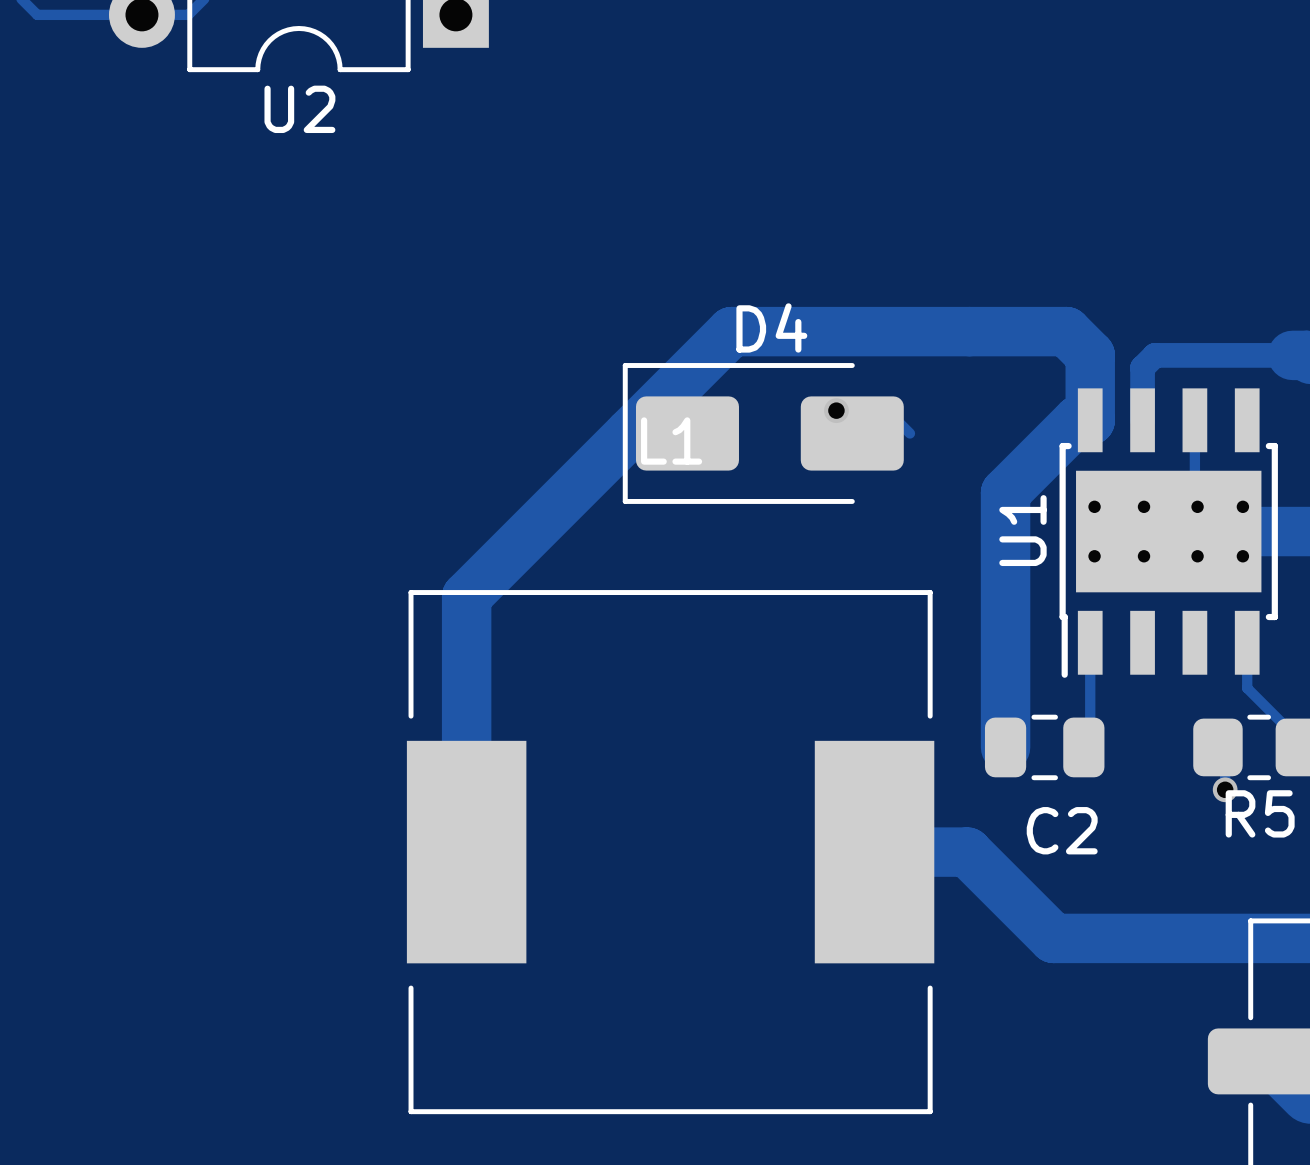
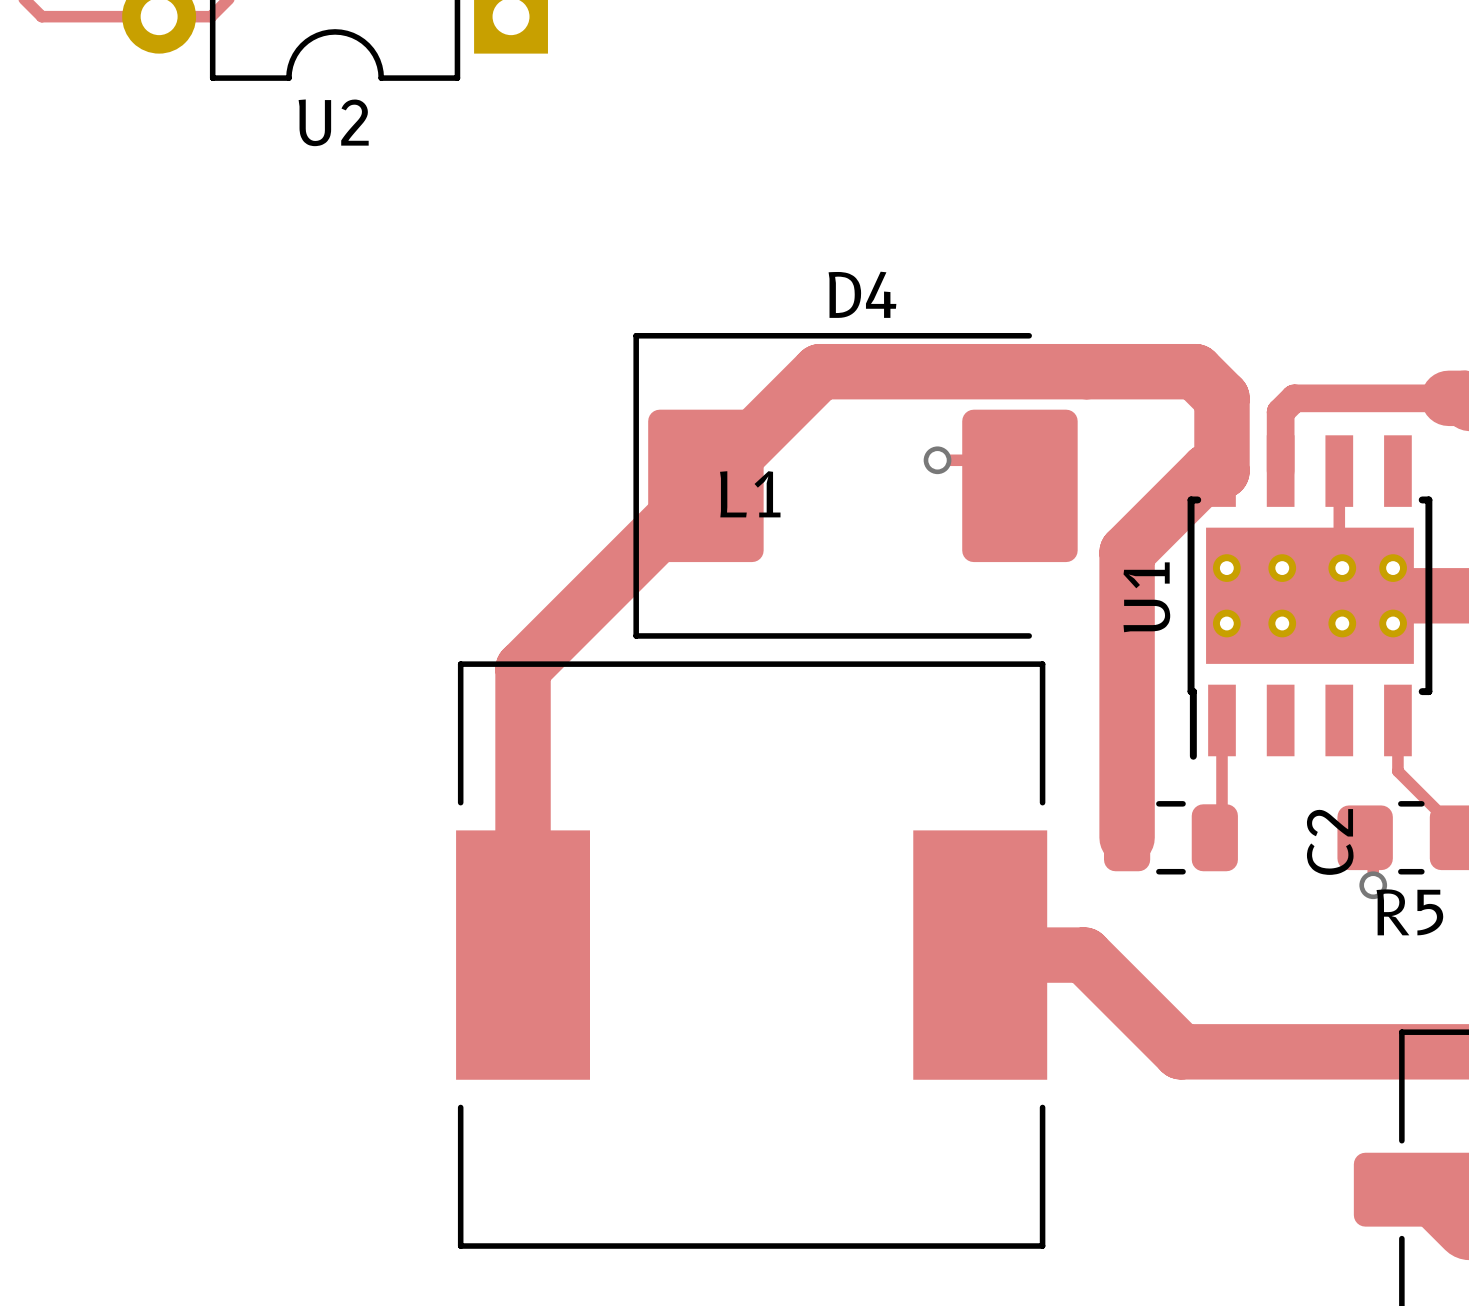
D4 footprint: [622, 363, 904, 504] -> [633, 333, 1078, 639]
C2 name rotation: 0° (1062, 830) -> 90° counterclockwise (1330, 841)
C2 name position: C2 (1062, 830) -> C2 (1330, 841)

